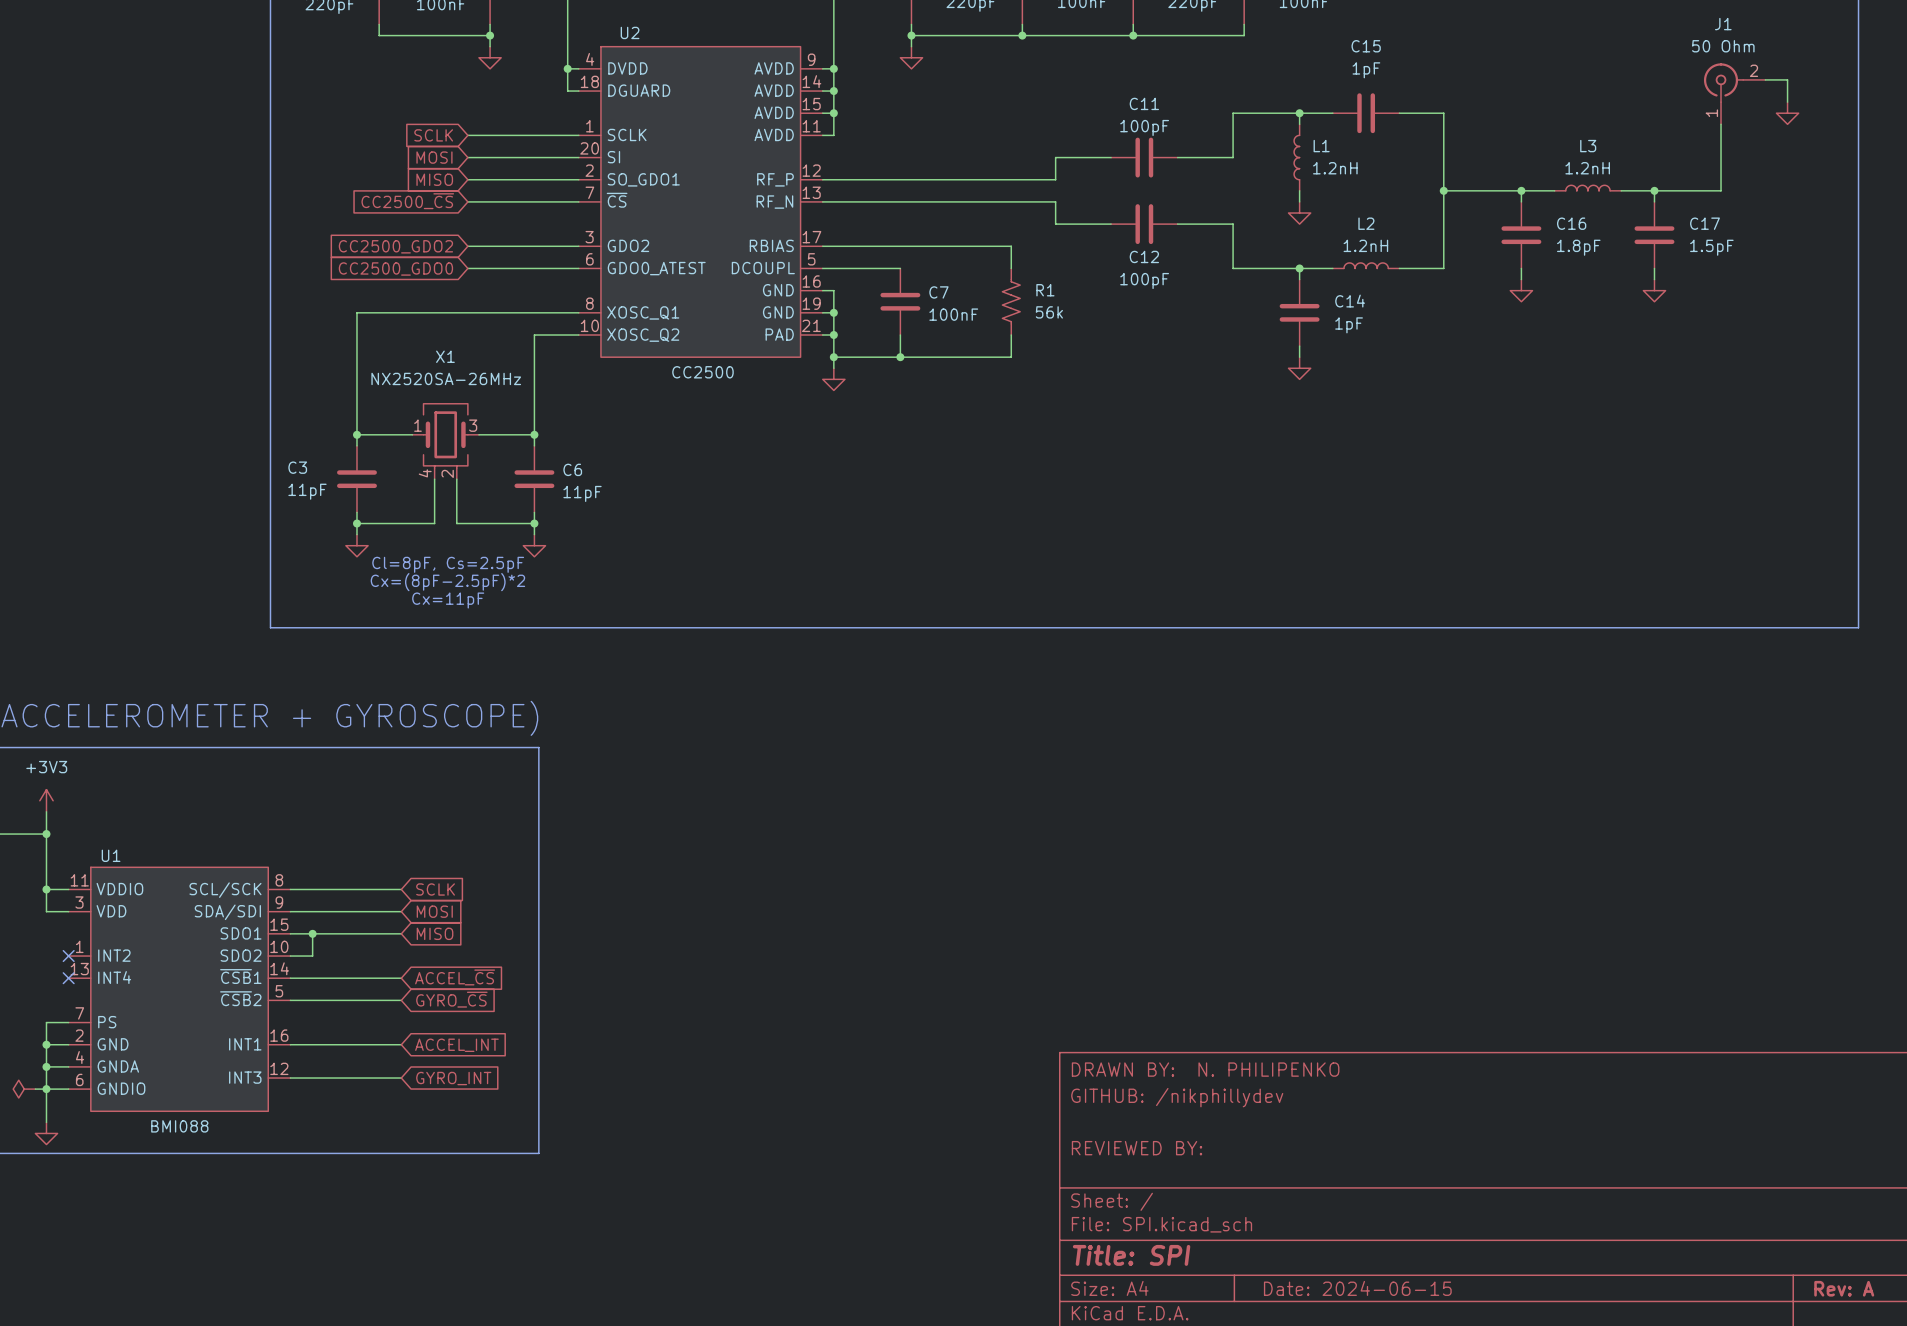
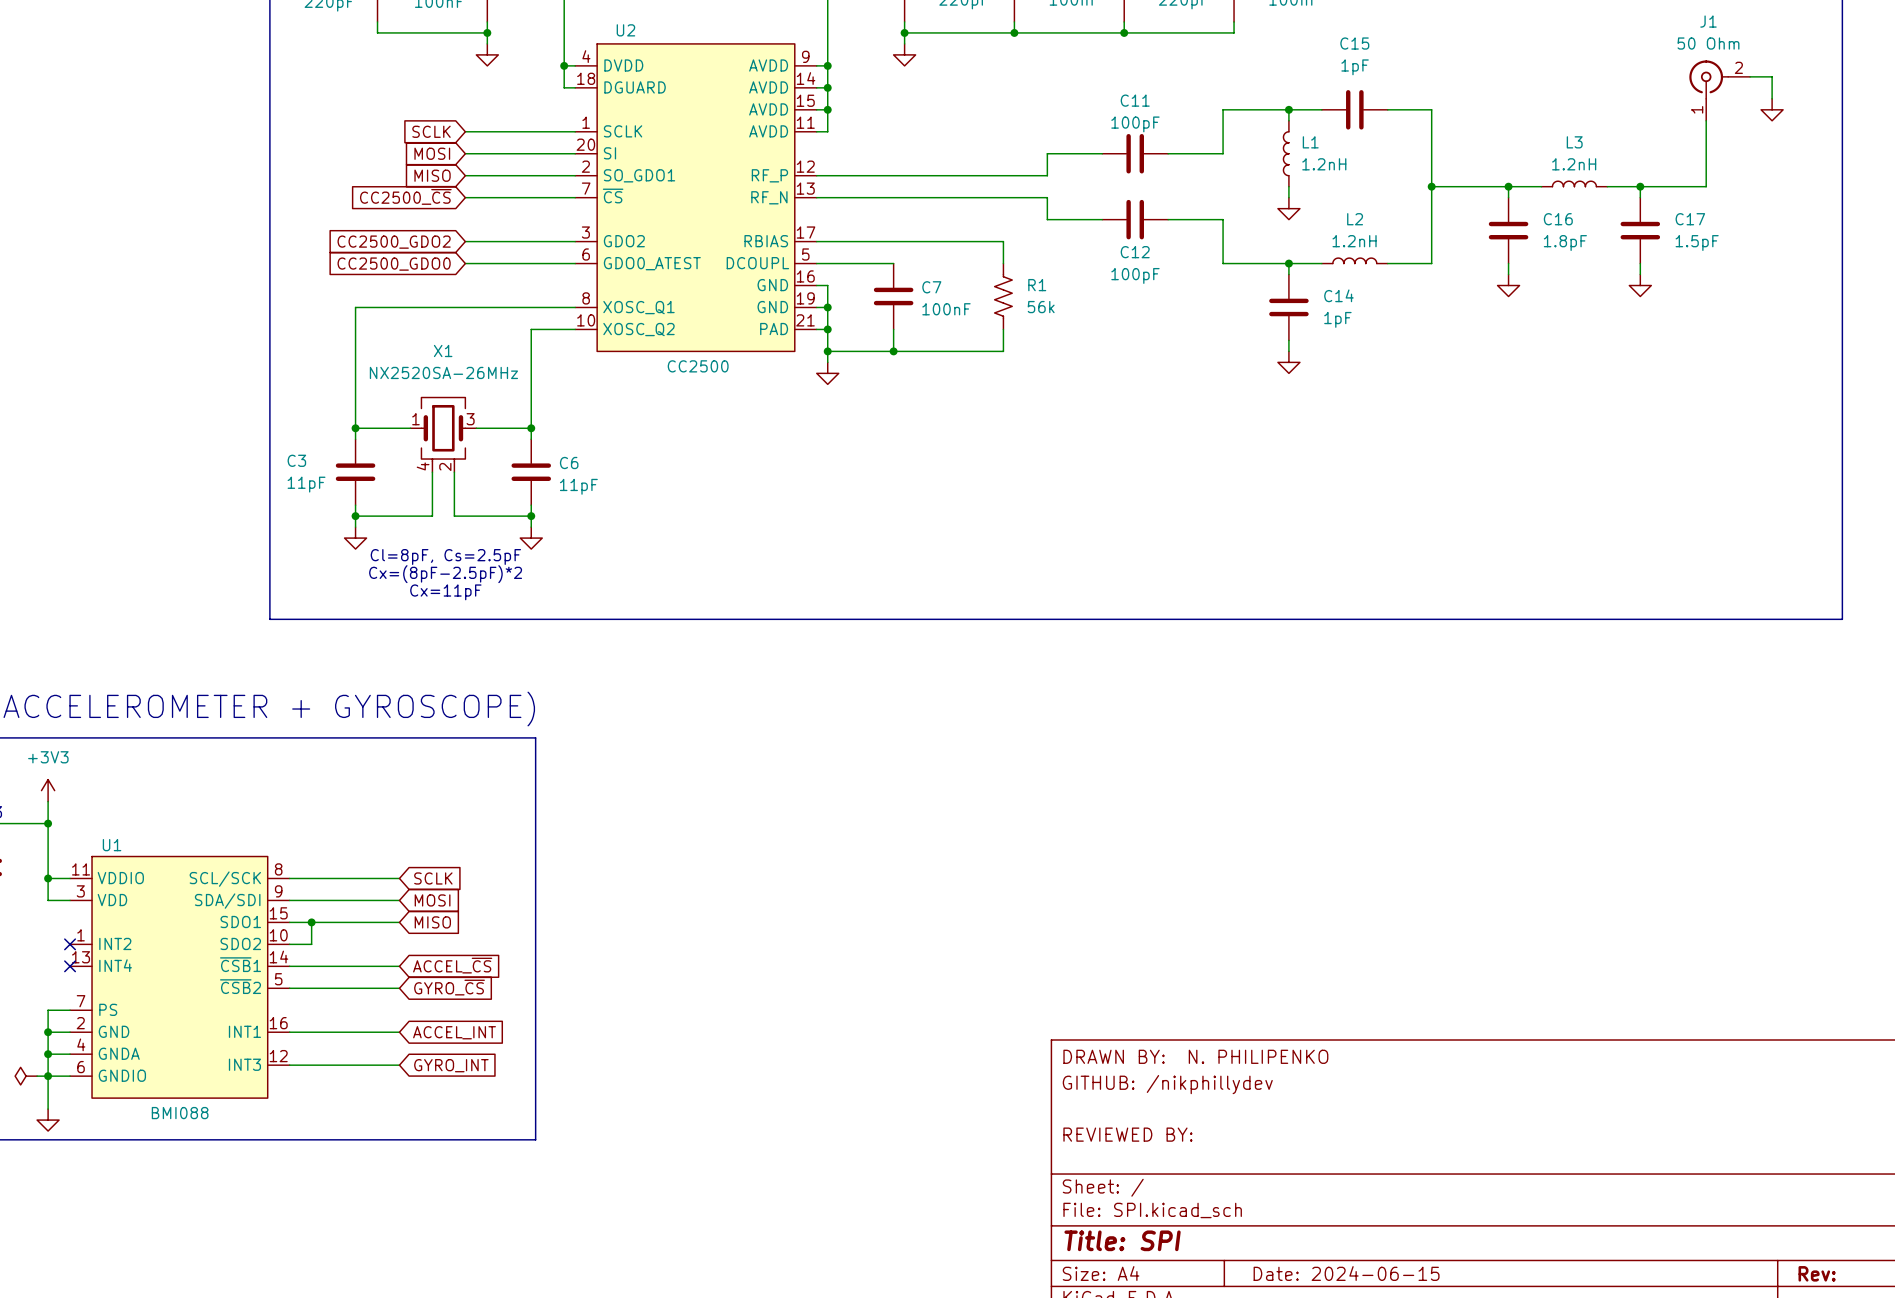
title block: Rev: A (1844, 1288) -> Rev: (1817, 1273)

